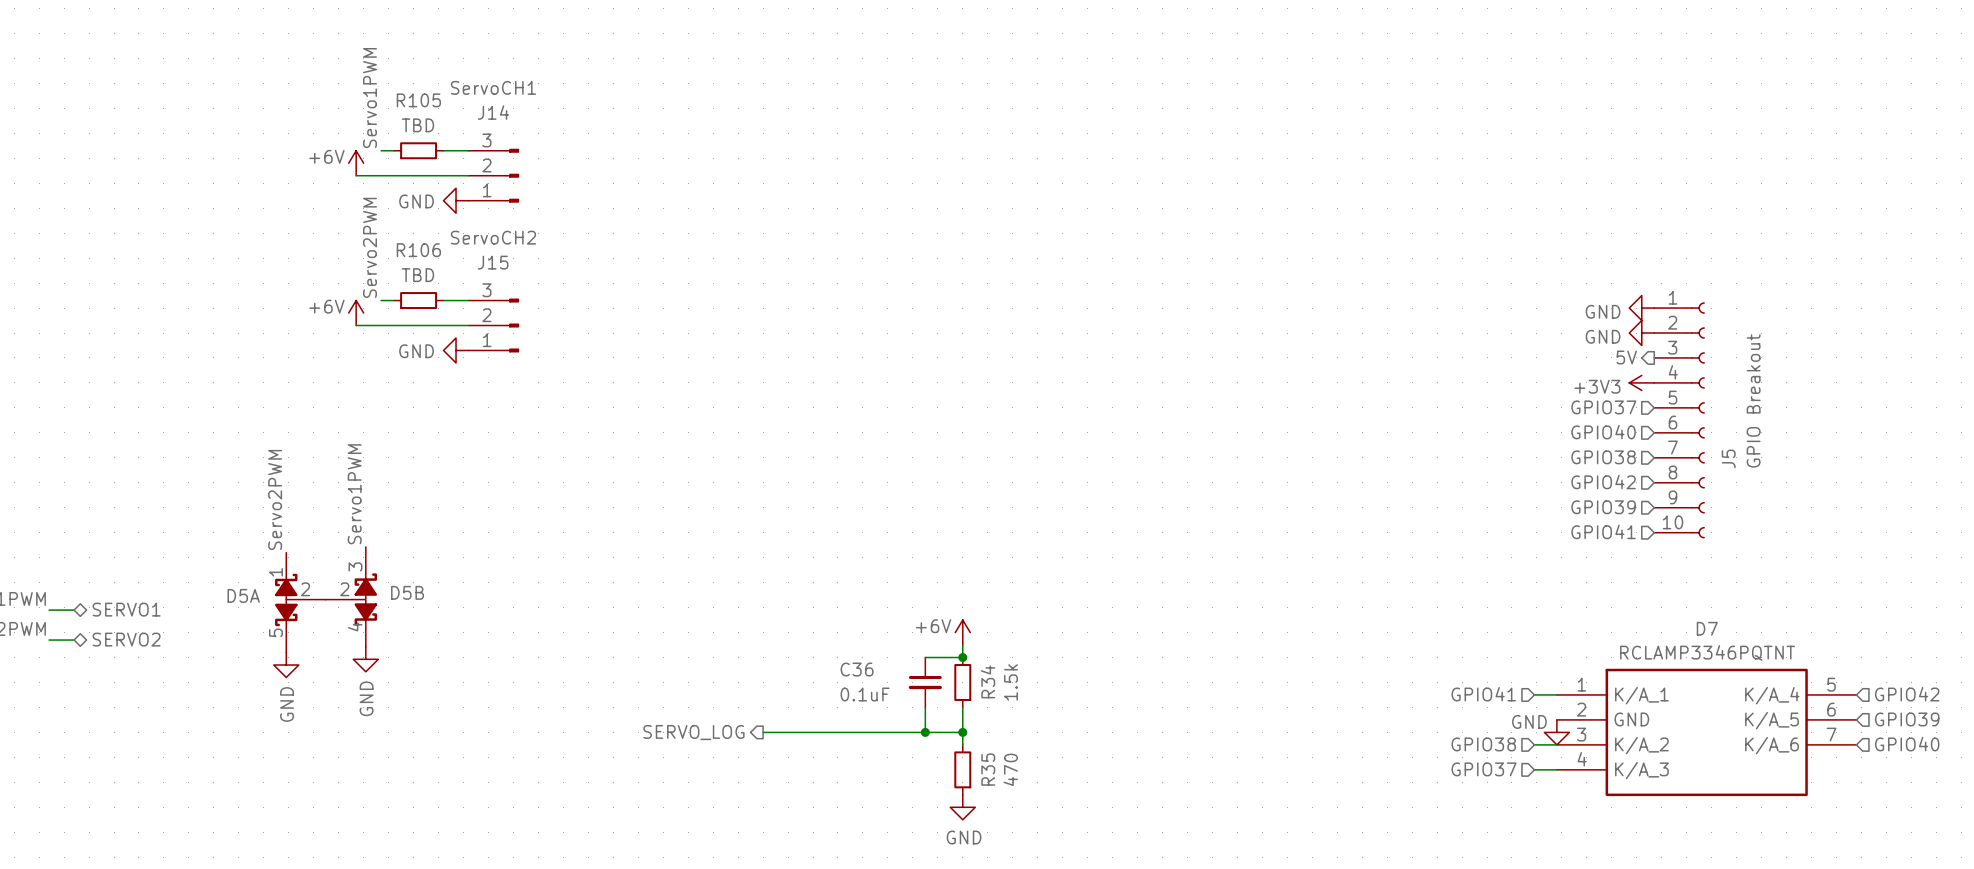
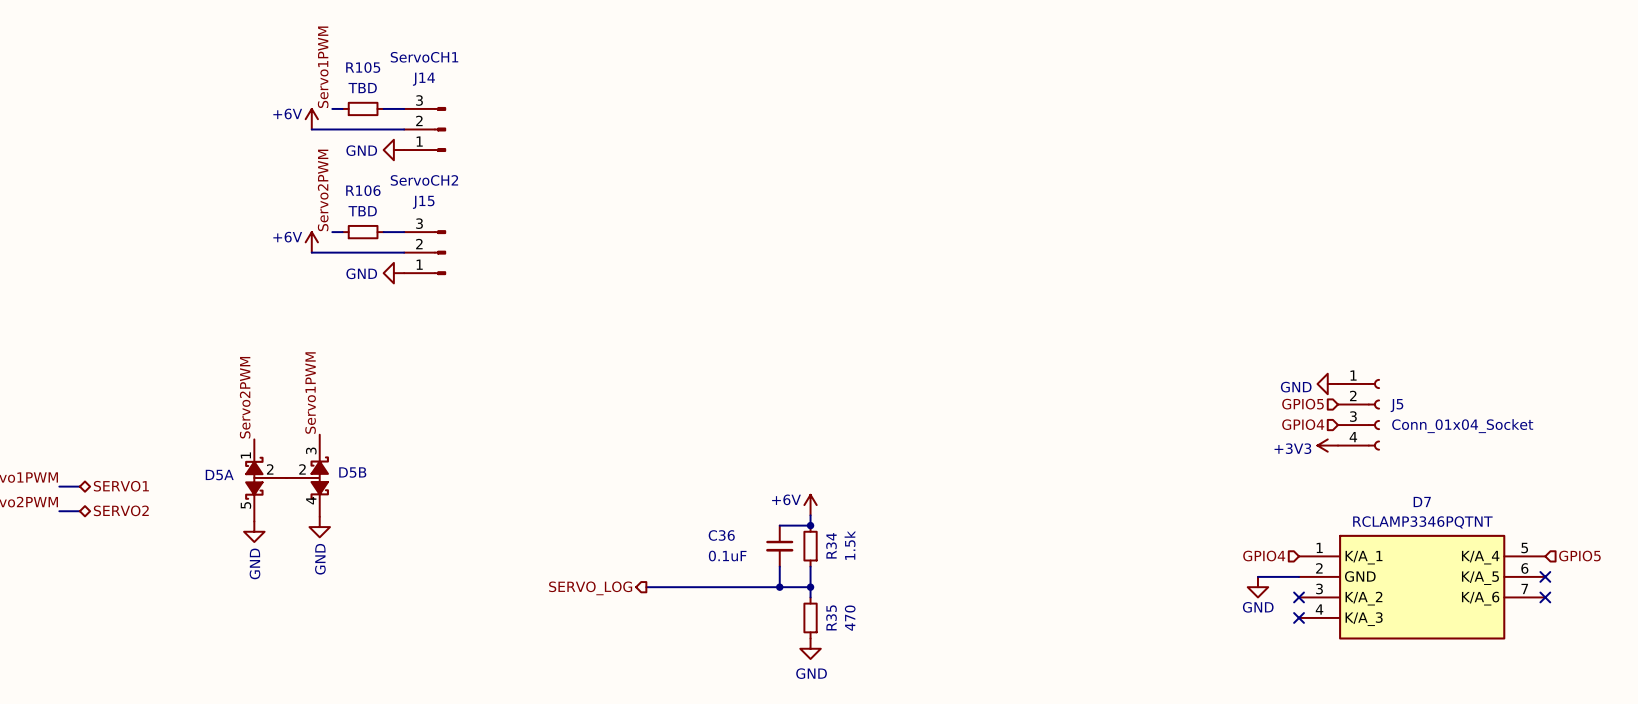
J5 symbol: [1654, 302, 1705, 539] -> [1338, 379, 1380, 451]
power symbol: GND (1641, 308) -> none
power symbol: GND (1641, 333) -> none
hierarchical label: 5V (1626, 357) -> none
power symbol position: +3V3 (1641, 382) -> +3V3 (1327, 445)
J5 value: GPIO Breakout (1753, 400) -> Conn_01x04_Socket (1462, 426)
hierarchical label: GPIO37 (1603, 407) -> none
hierarchical label: GPIO40 (1603, 432) -> none
hierarchical label: GPIO38 (1603, 457) -> none
J5 name position: J5 (1728, 458) -> J5 (1396, 405)
hierarchical label: GPIO42 (1603, 482) -> none
power symbol: none -> GND (1327, 383)
hierarchical label: GPIO39 (1603, 507) -> none
hierarchical label: none -> GPIO5 (1302, 404)
hierarchical label: GPIO41 (1603, 531) -> none
hierarchical label: none -> GPIO4 (1303, 424)
hierarchical label: GPIO41 (1483, 694) -> GPIO4 (1264, 556)
wire: (1534, 694) (1556, 694) -> none
hierarchical label: GPIO42 (1907, 694) -> GPIO5 (1579, 556)
wire: none -> (1257, 576) (1299, 576)
no-connect mark: none -> (1545, 576)
hierarchical label: GPIO39 (1907, 719) -> none
power symbol text position: GND (1529, 721) -> GND (1258, 607)
power symbol position: GND (1556, 732) -> GND (1257, 587)
hierarchical label: GPIO38 (1483, 744) -> none
wire: (1534, 744) (1556, 744) -> none
no-connect mark: none -> (1299, 597)
no-connect mark: none -> (1545, 597)
hierarchical label: GPIO40 (1907, 744) -> none
hierarchical label: GPIO37 (1484, 769) -> none
wire: (1534, 769) (1556, 769) -> none
no-connect mark: none -> (1299, 617)

